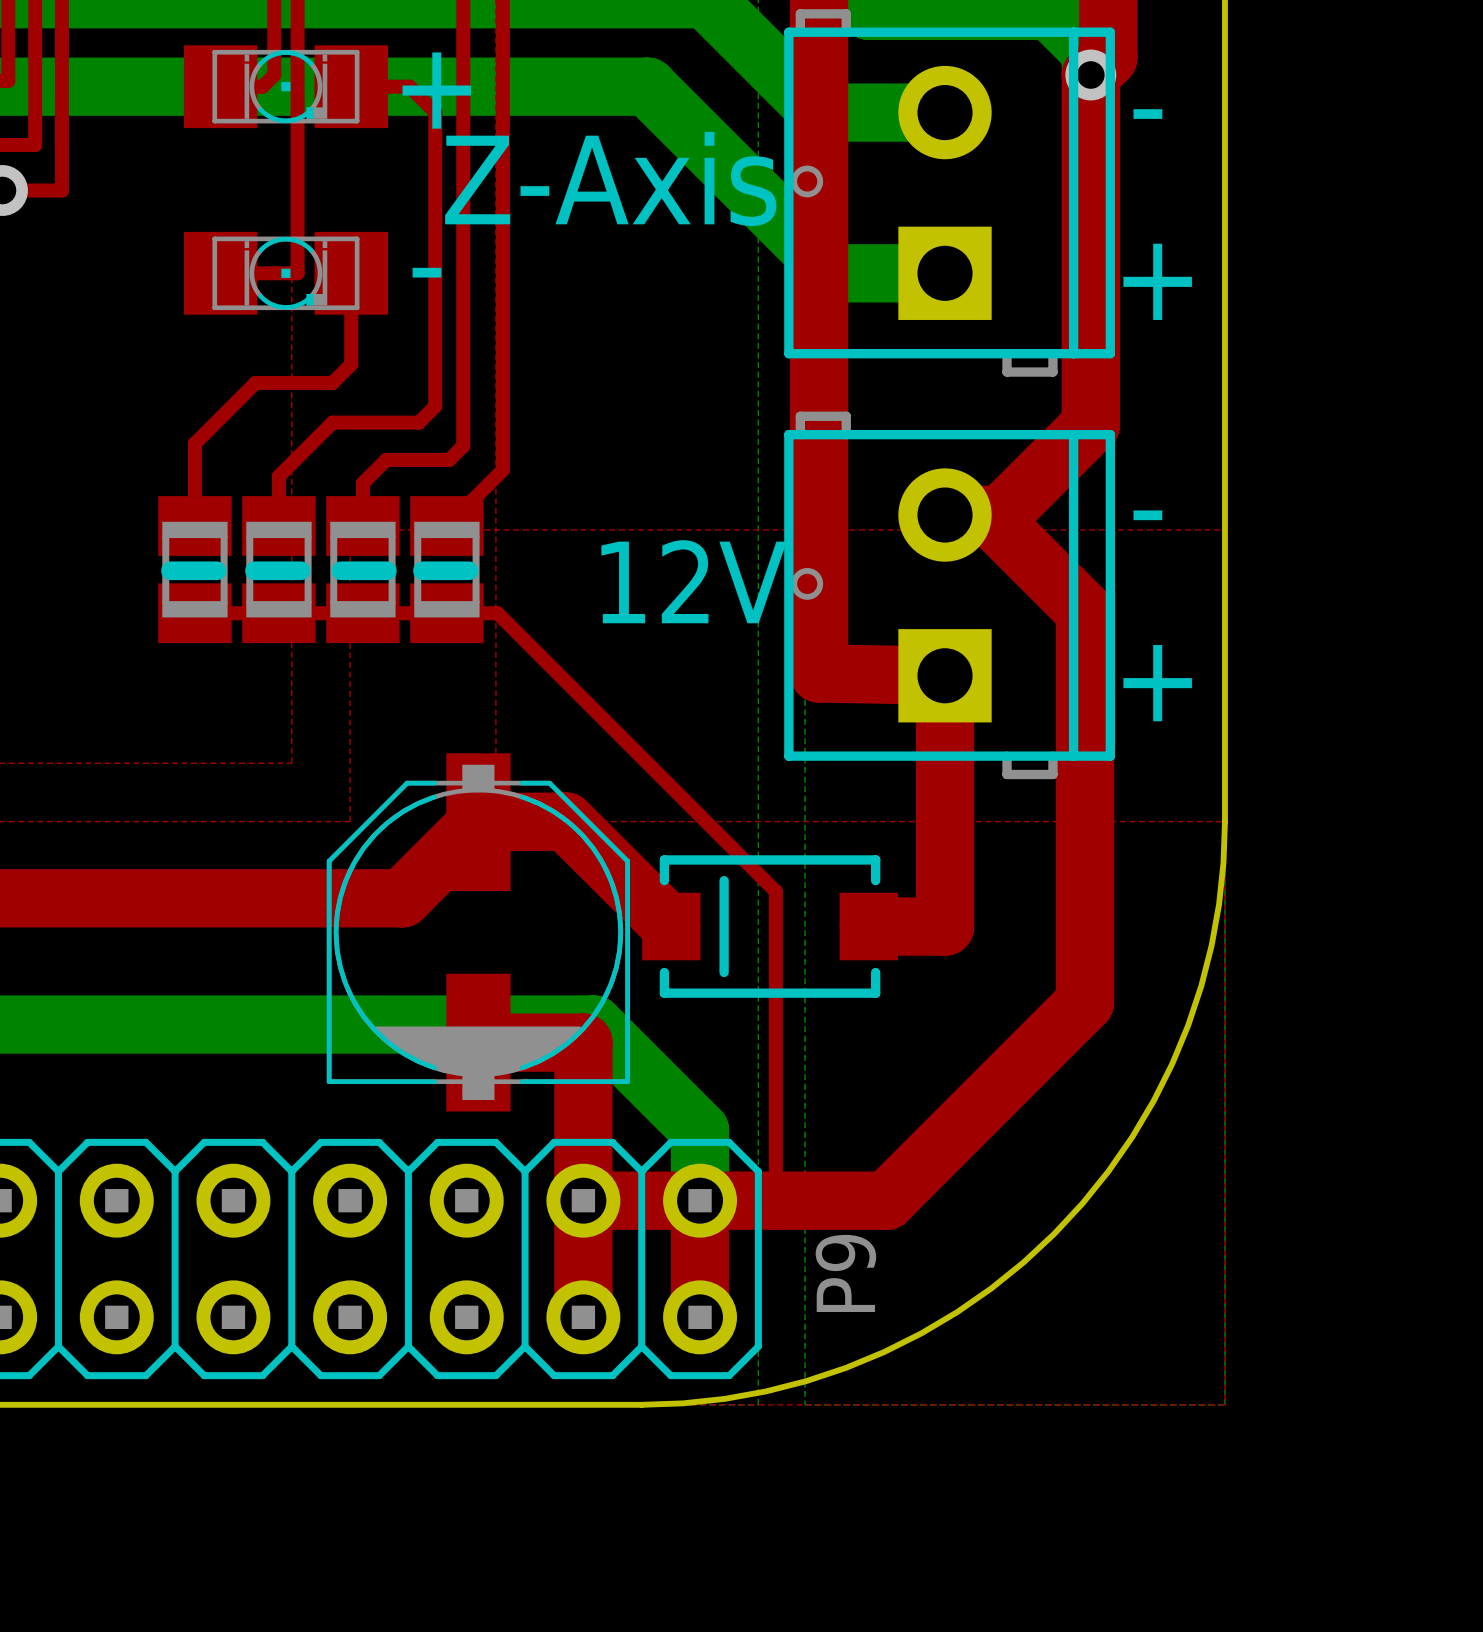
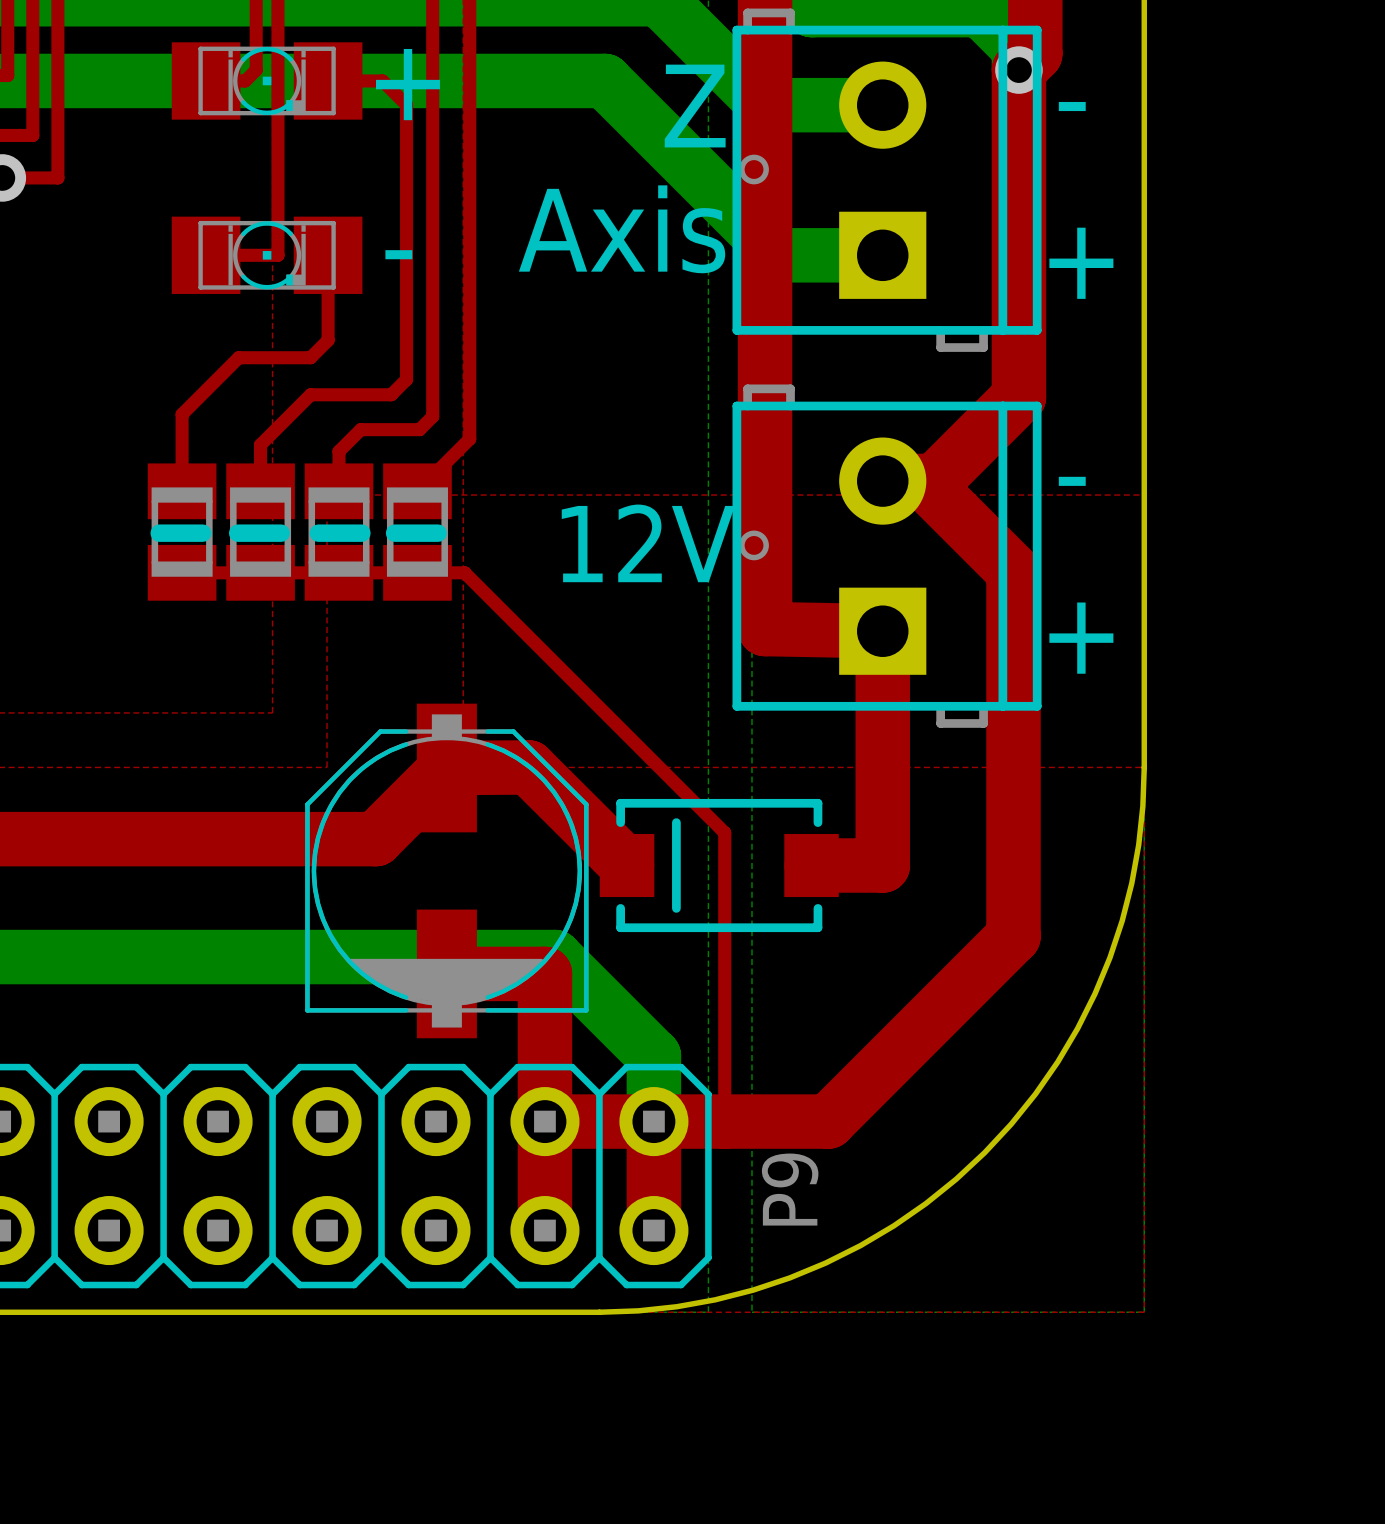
text: none -> Z (695, 106)
text: Z-Axis (610, 178) -> Axis (622, 229)

